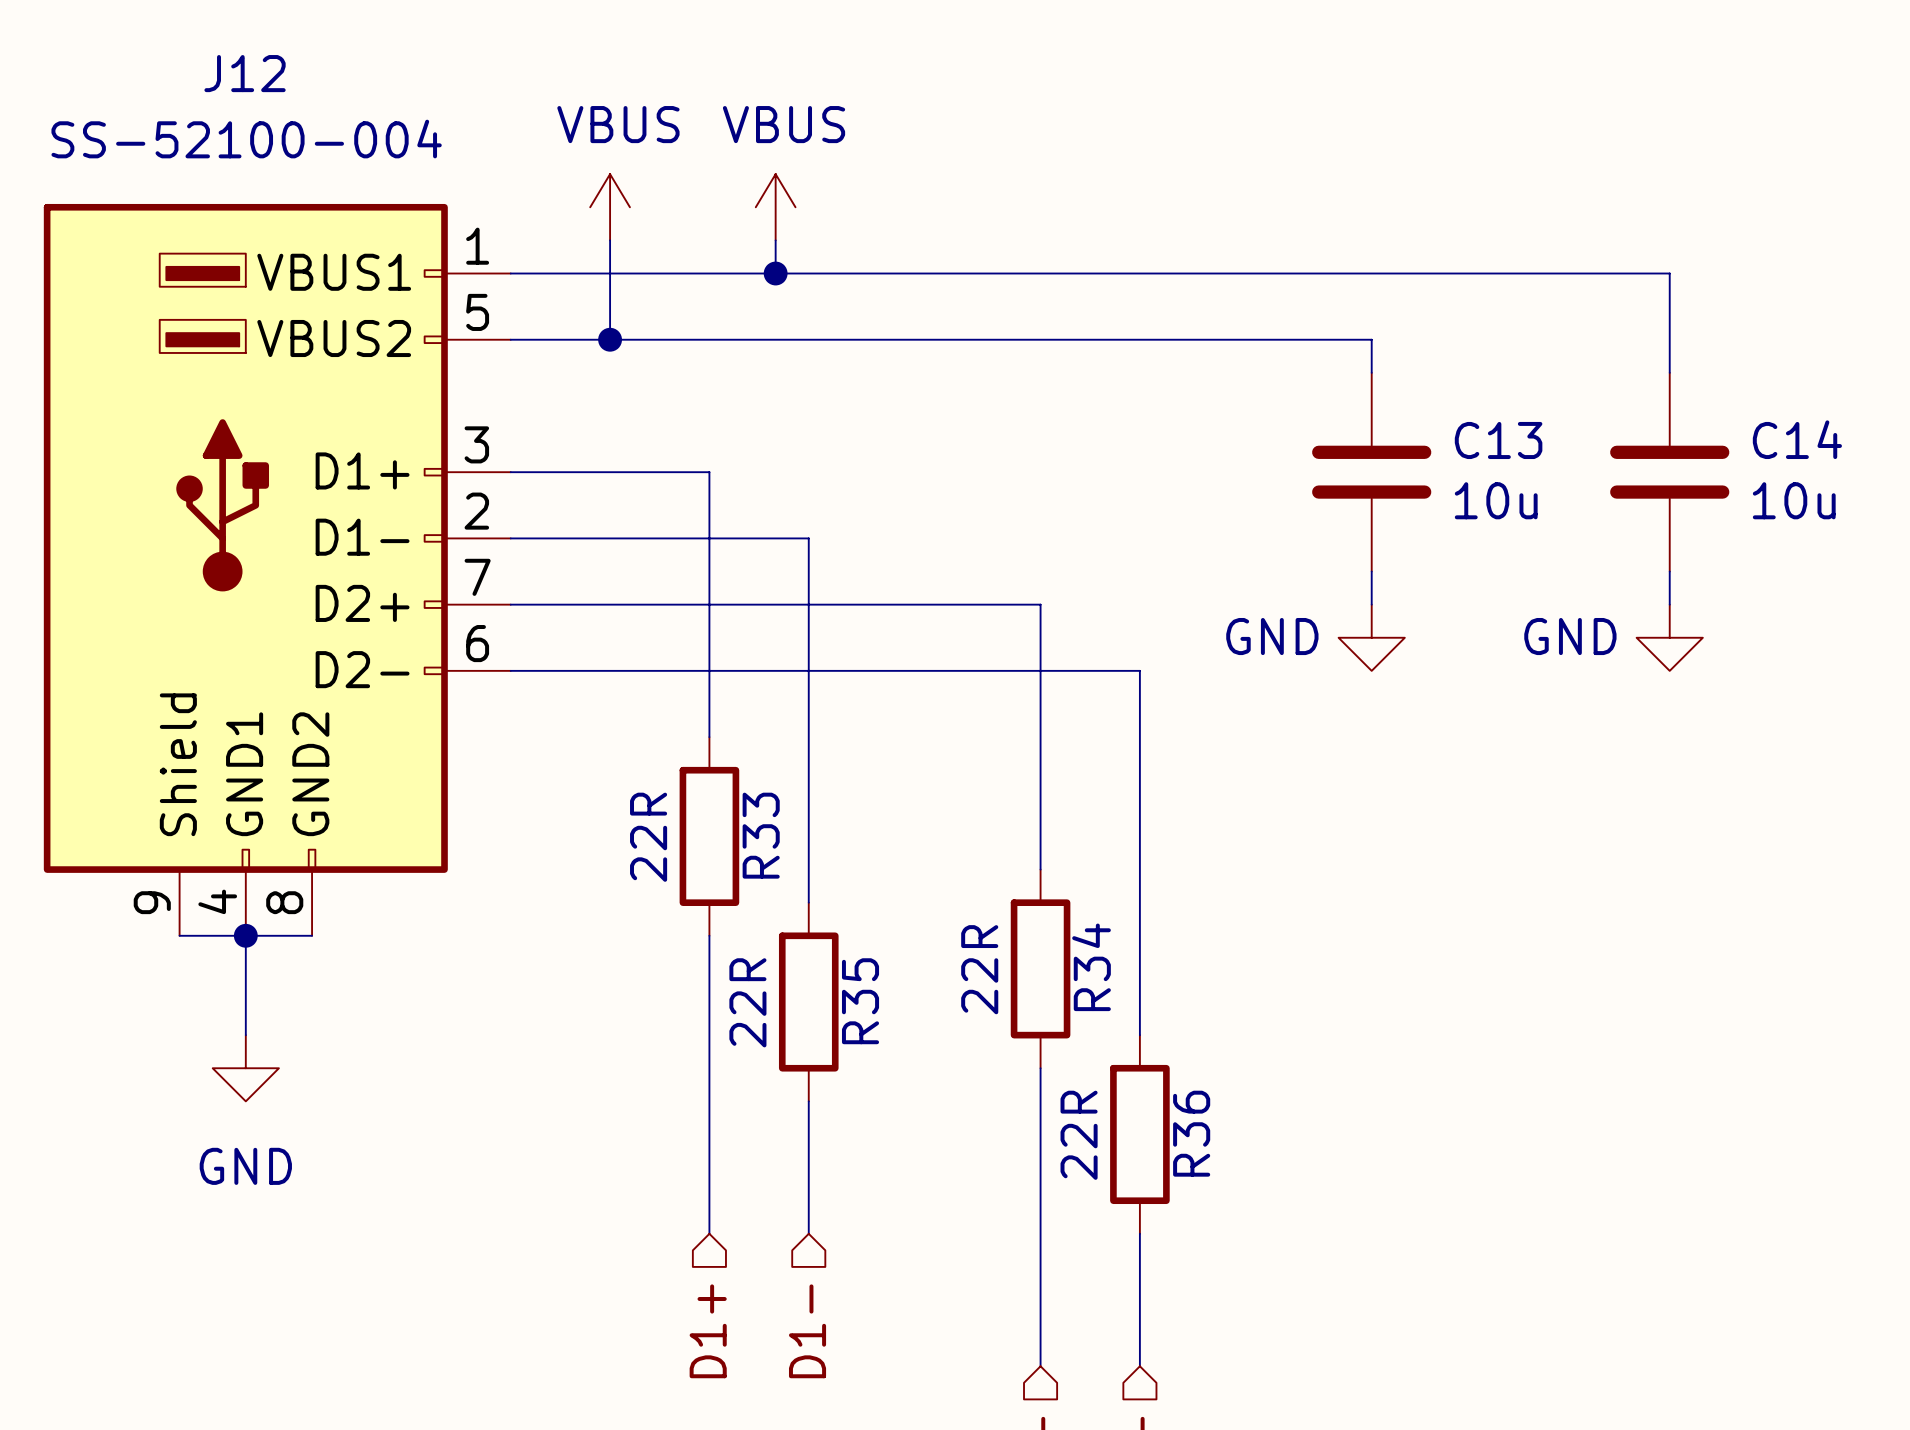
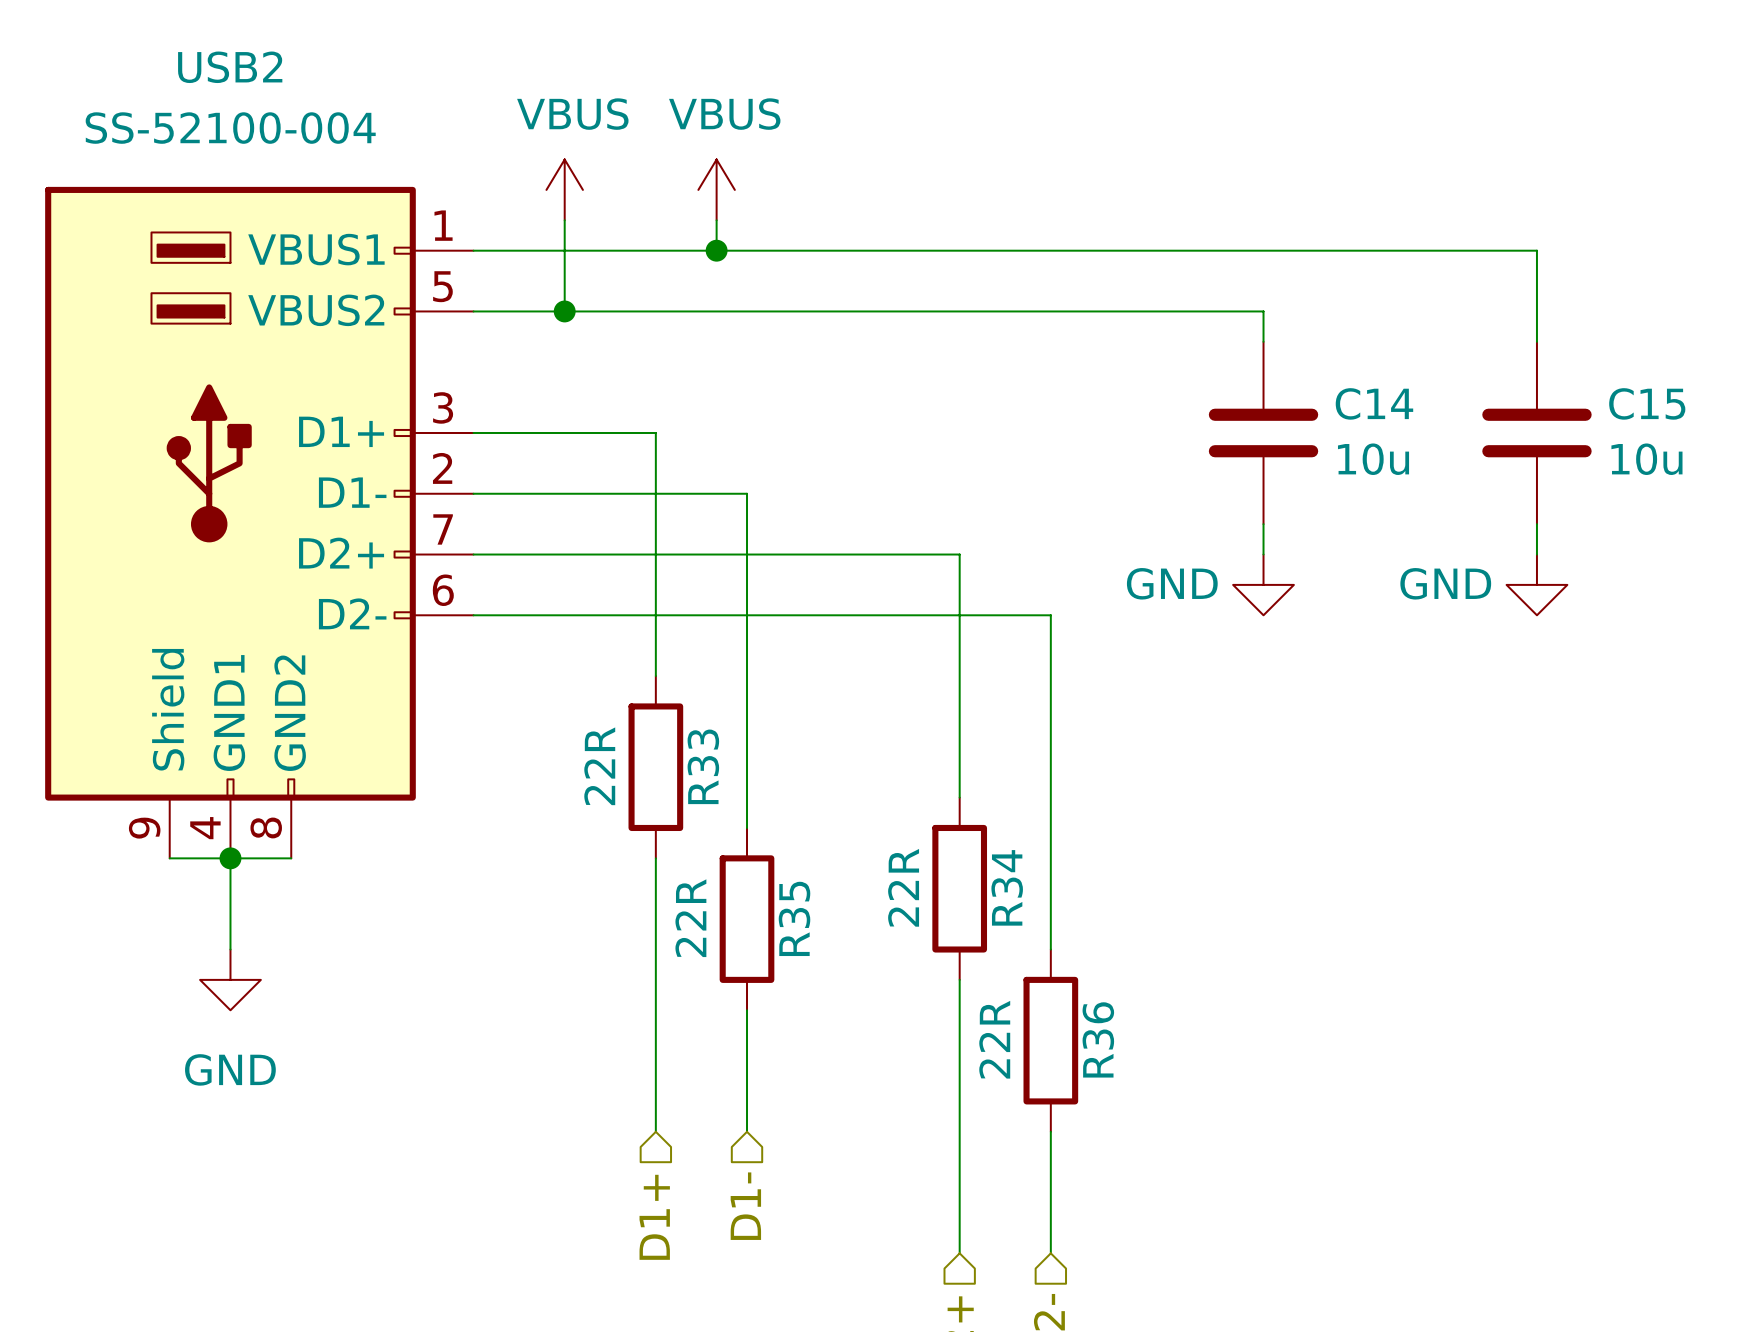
J12 name: J12 (245, 73) -> USB2 (230, 67)
C14 name: C14 (1797, 439) -> C15 (1647, 403)
C13 name: C13 (1498, 440) -> C14 (1374, 403)

